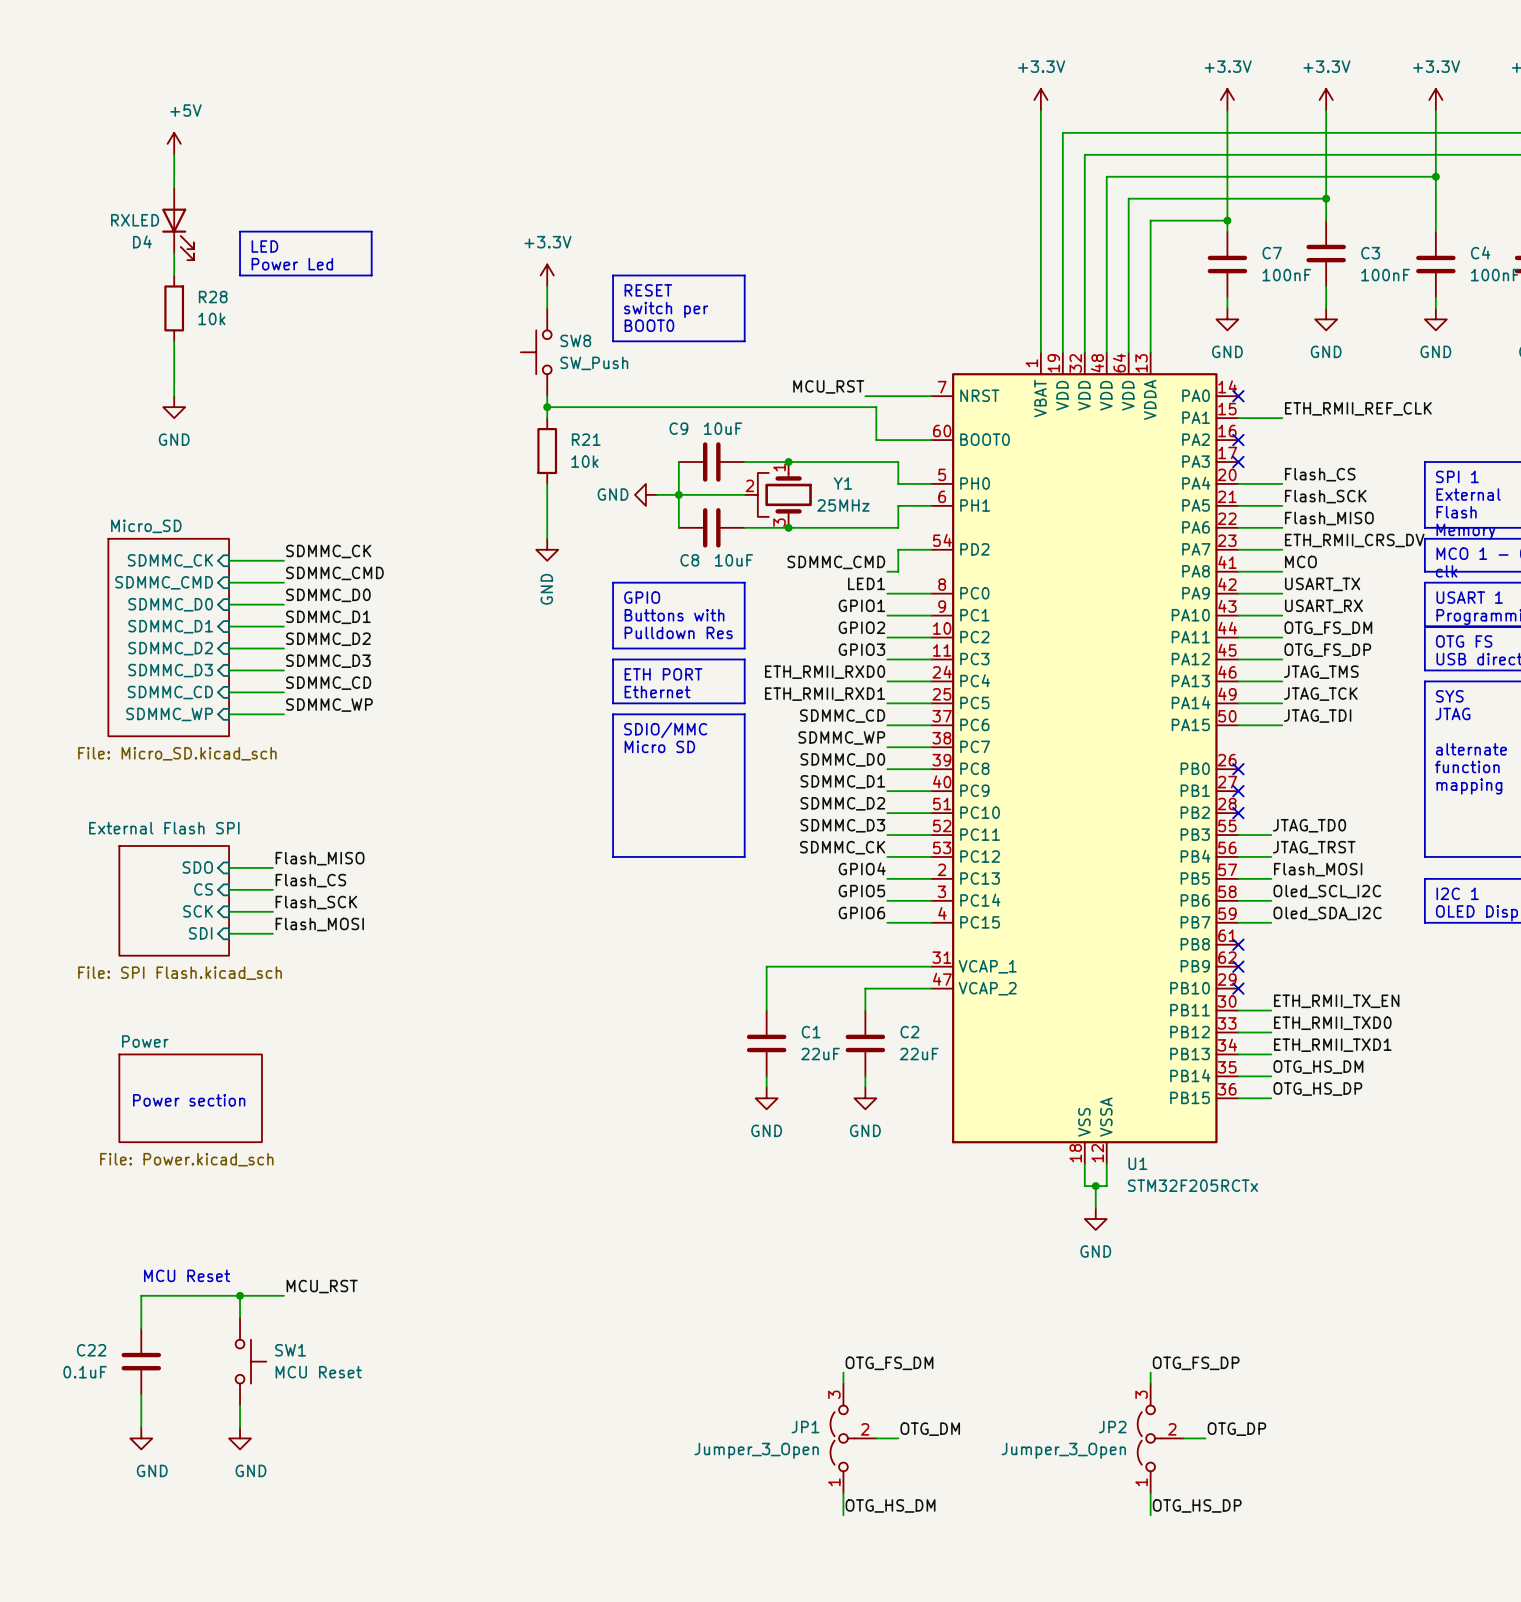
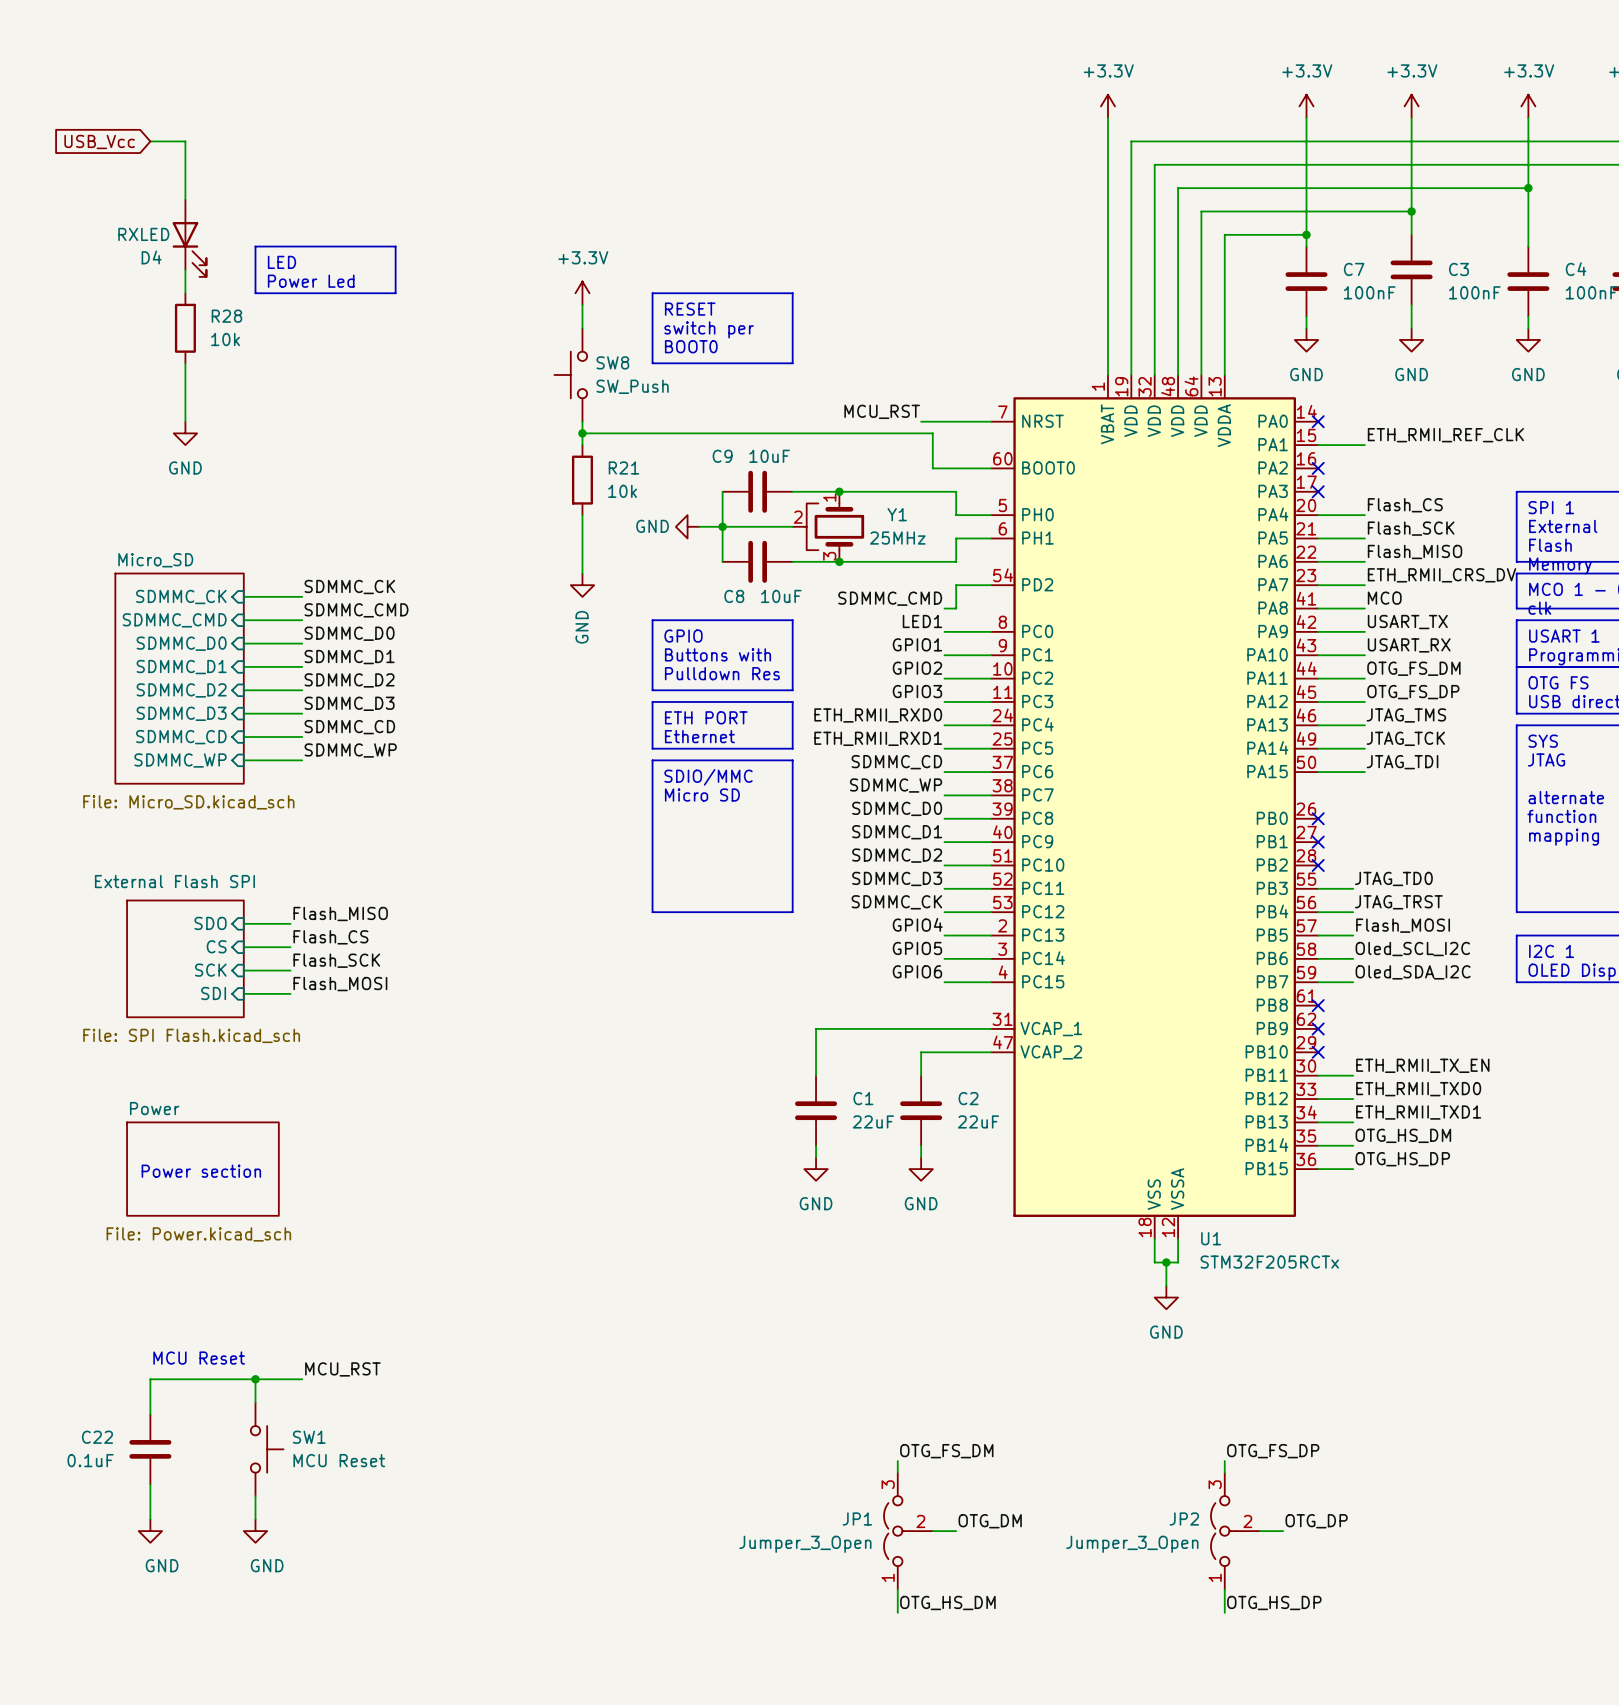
wire: none -> (150, 141) (185, 141) (185, 164)
global label: none -> USB_Vcc (99, 141)
power symbol: +5V (174, 143) -> none

